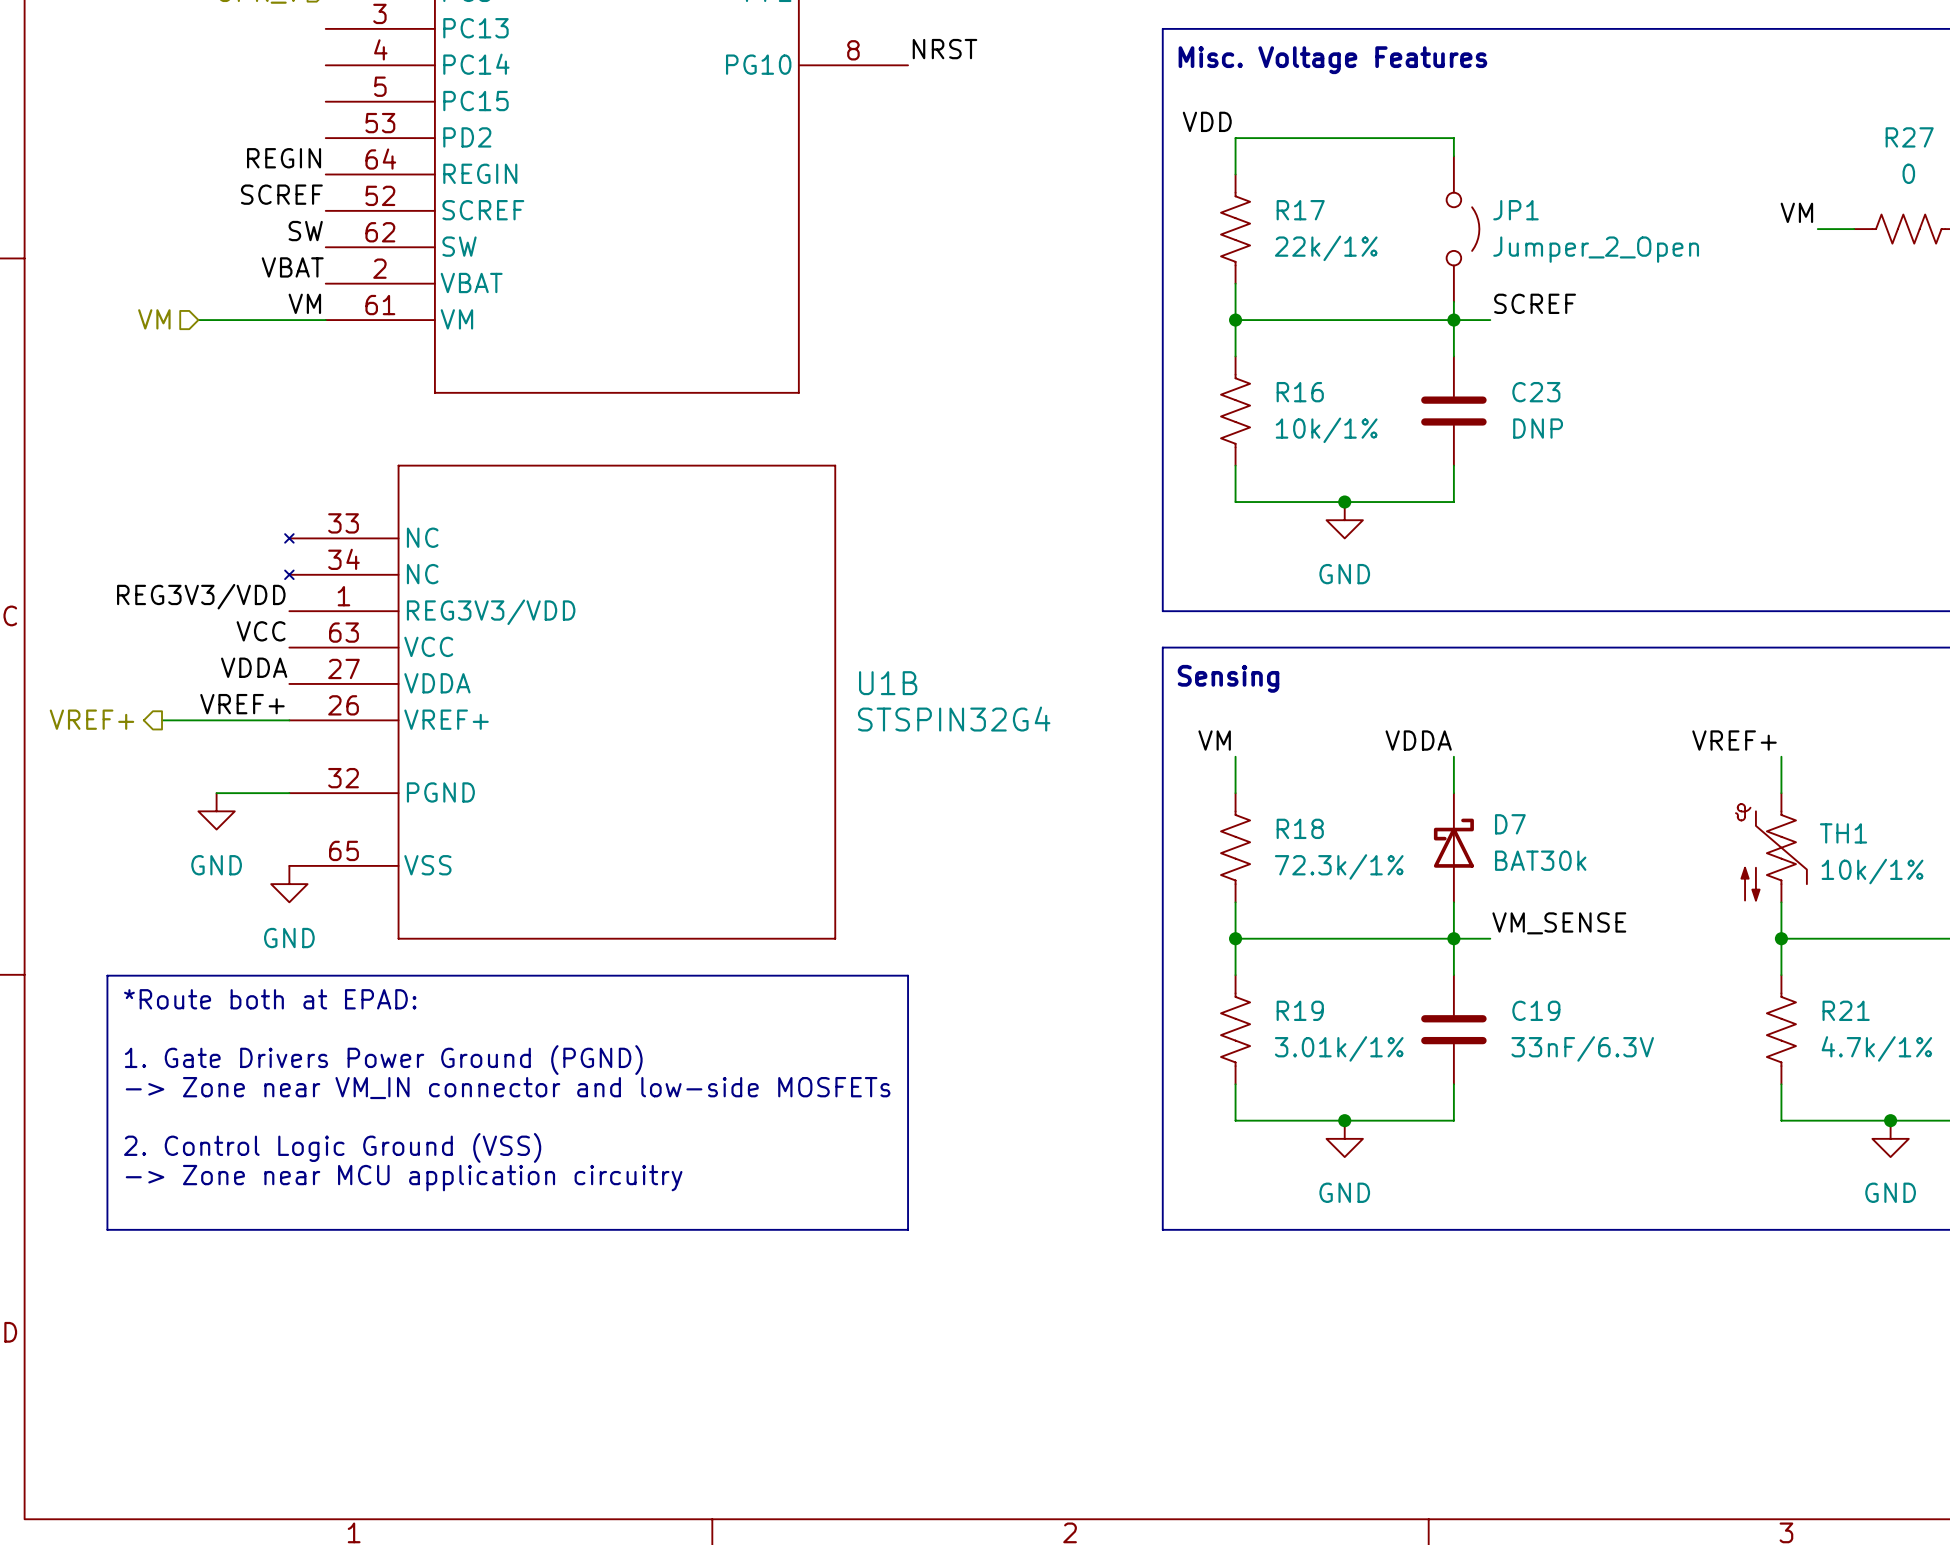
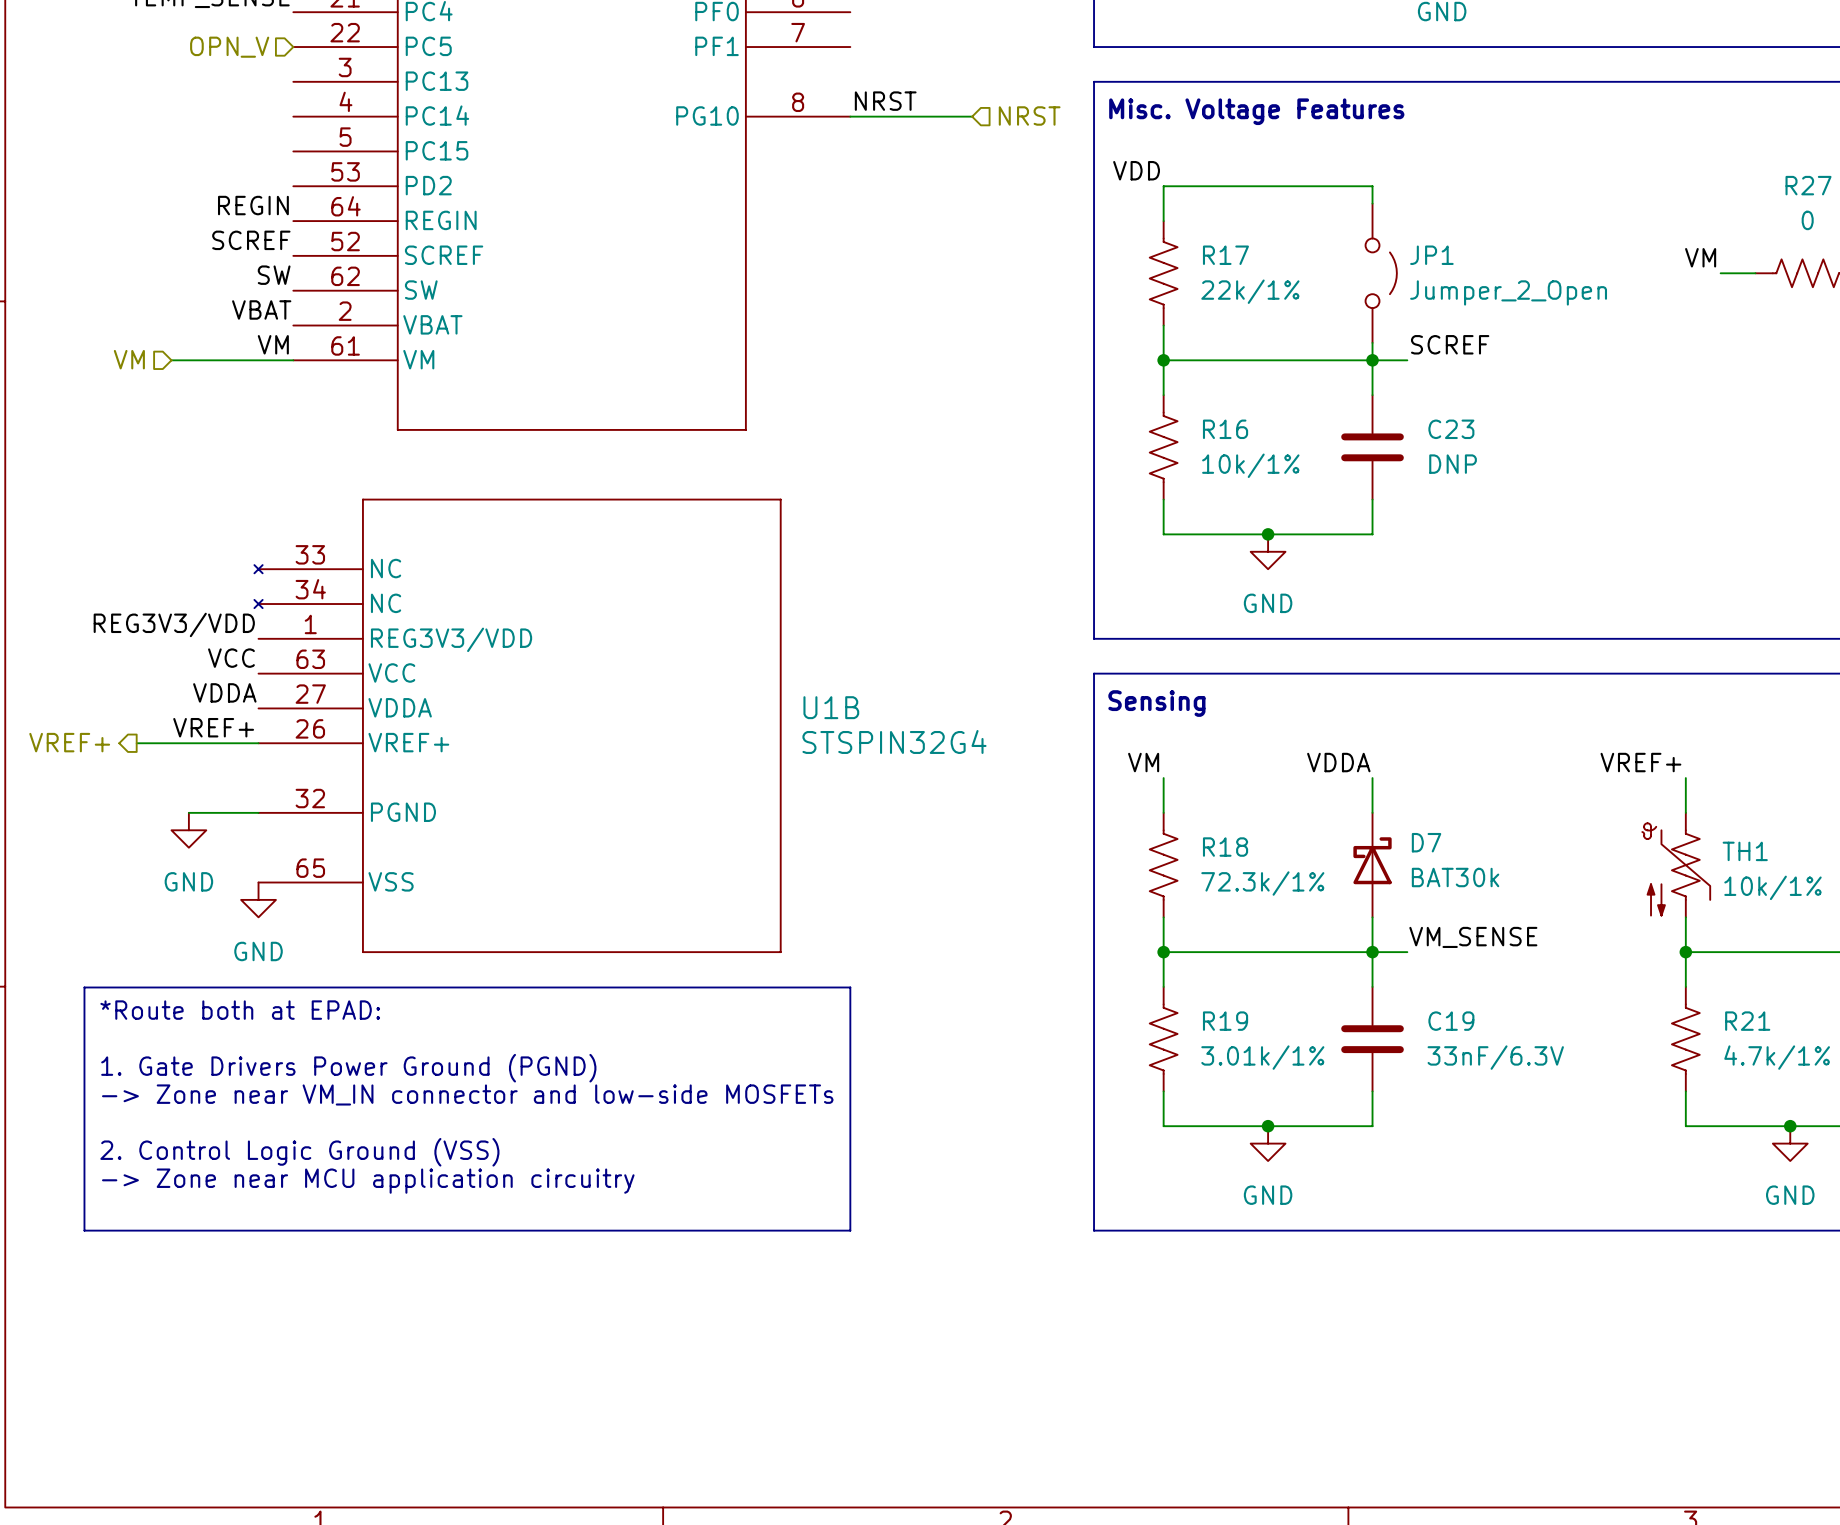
hierarchical label: none -> NRST (1029, 115)
wire: none -> (850, 116) (972, 116)

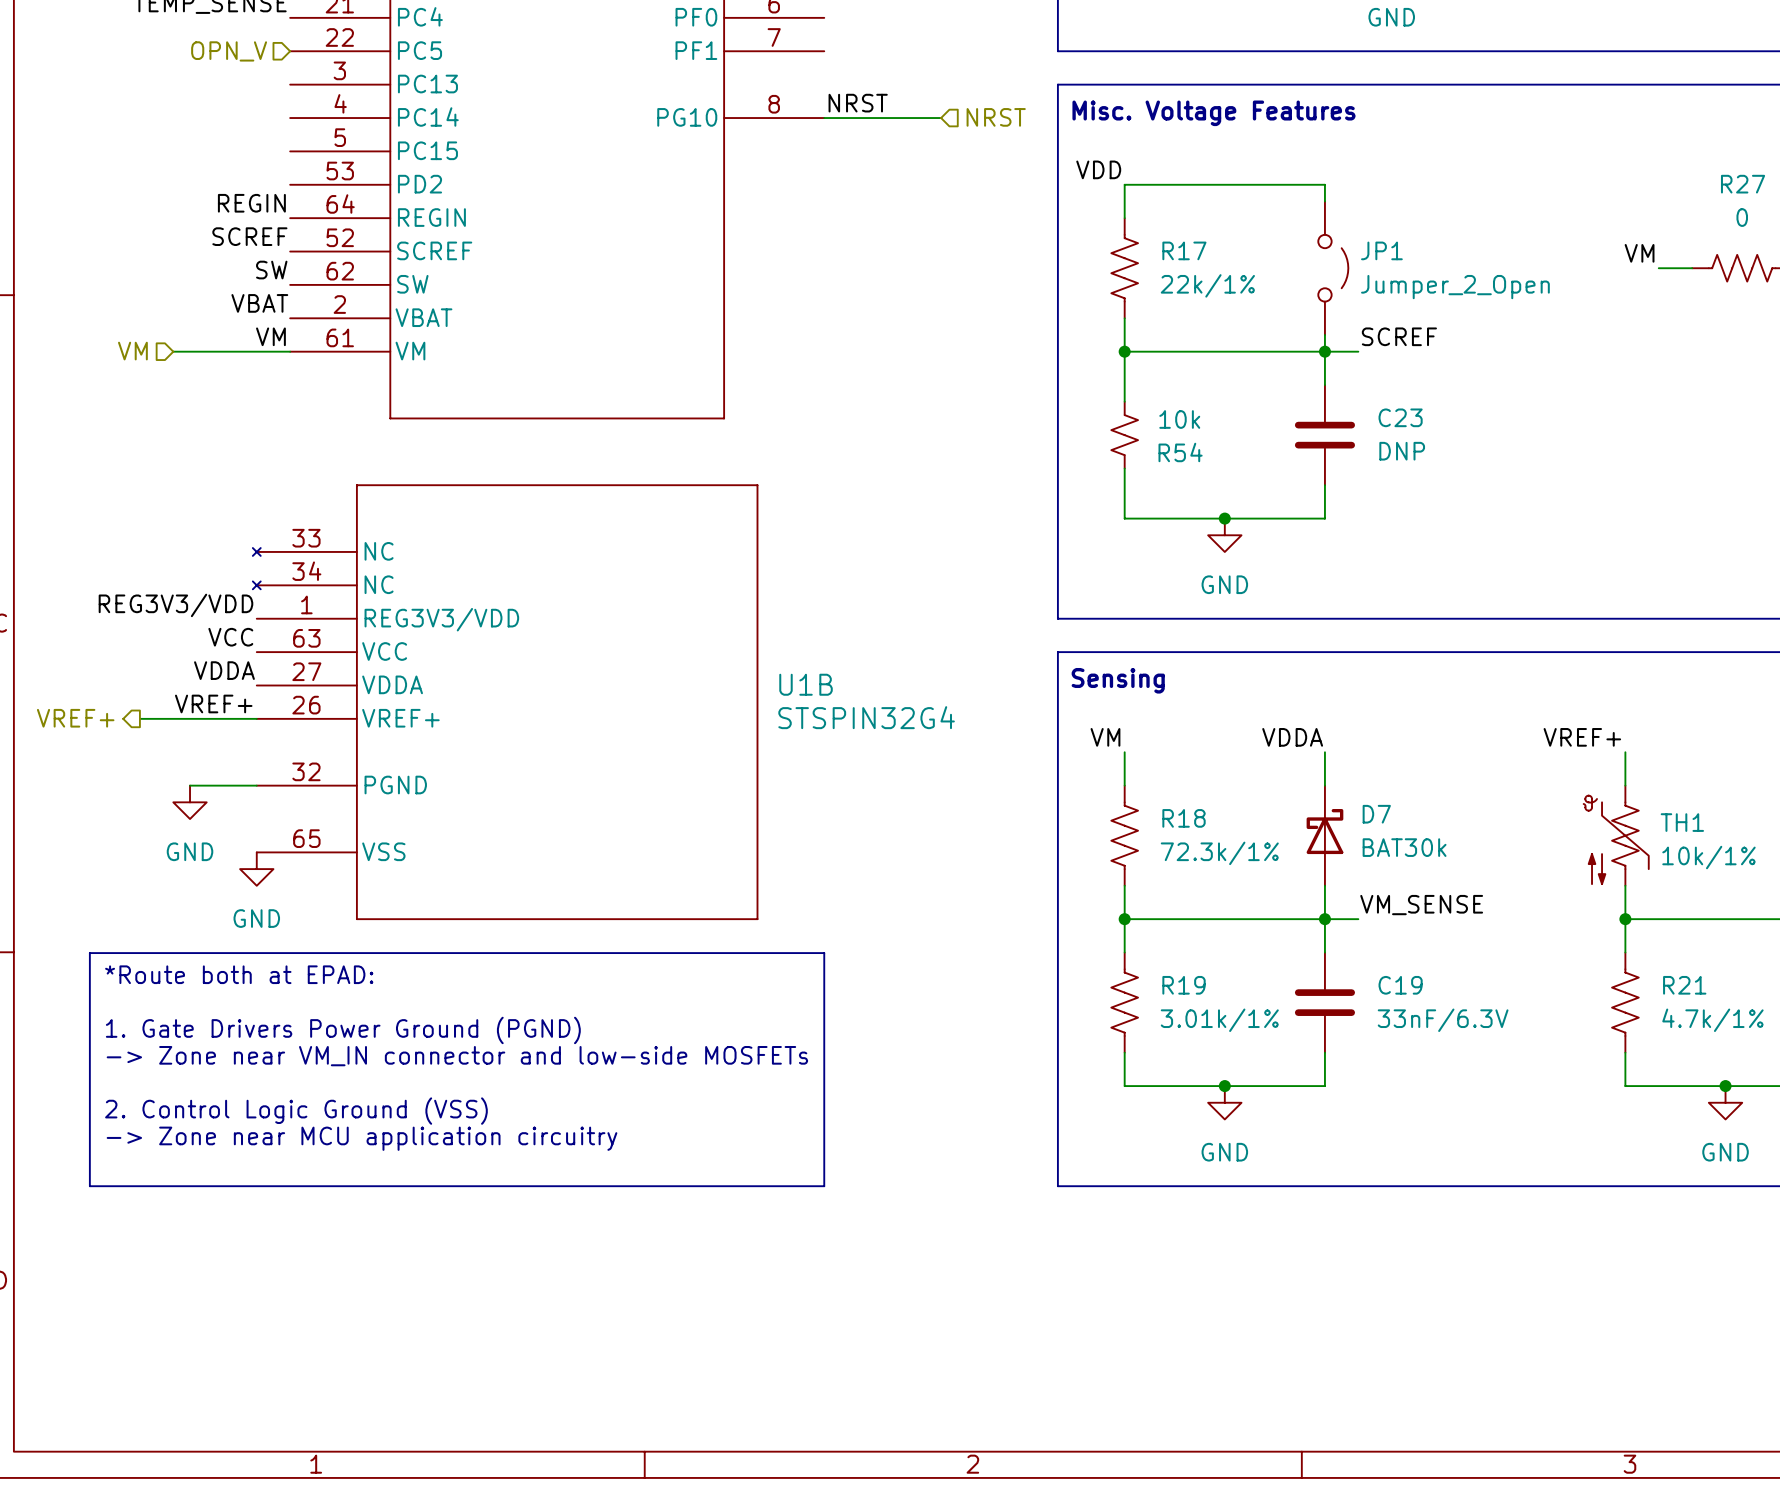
R16: 10k/1% (1163, 447) -> none
R54: none -> 10k (1124, 435)

